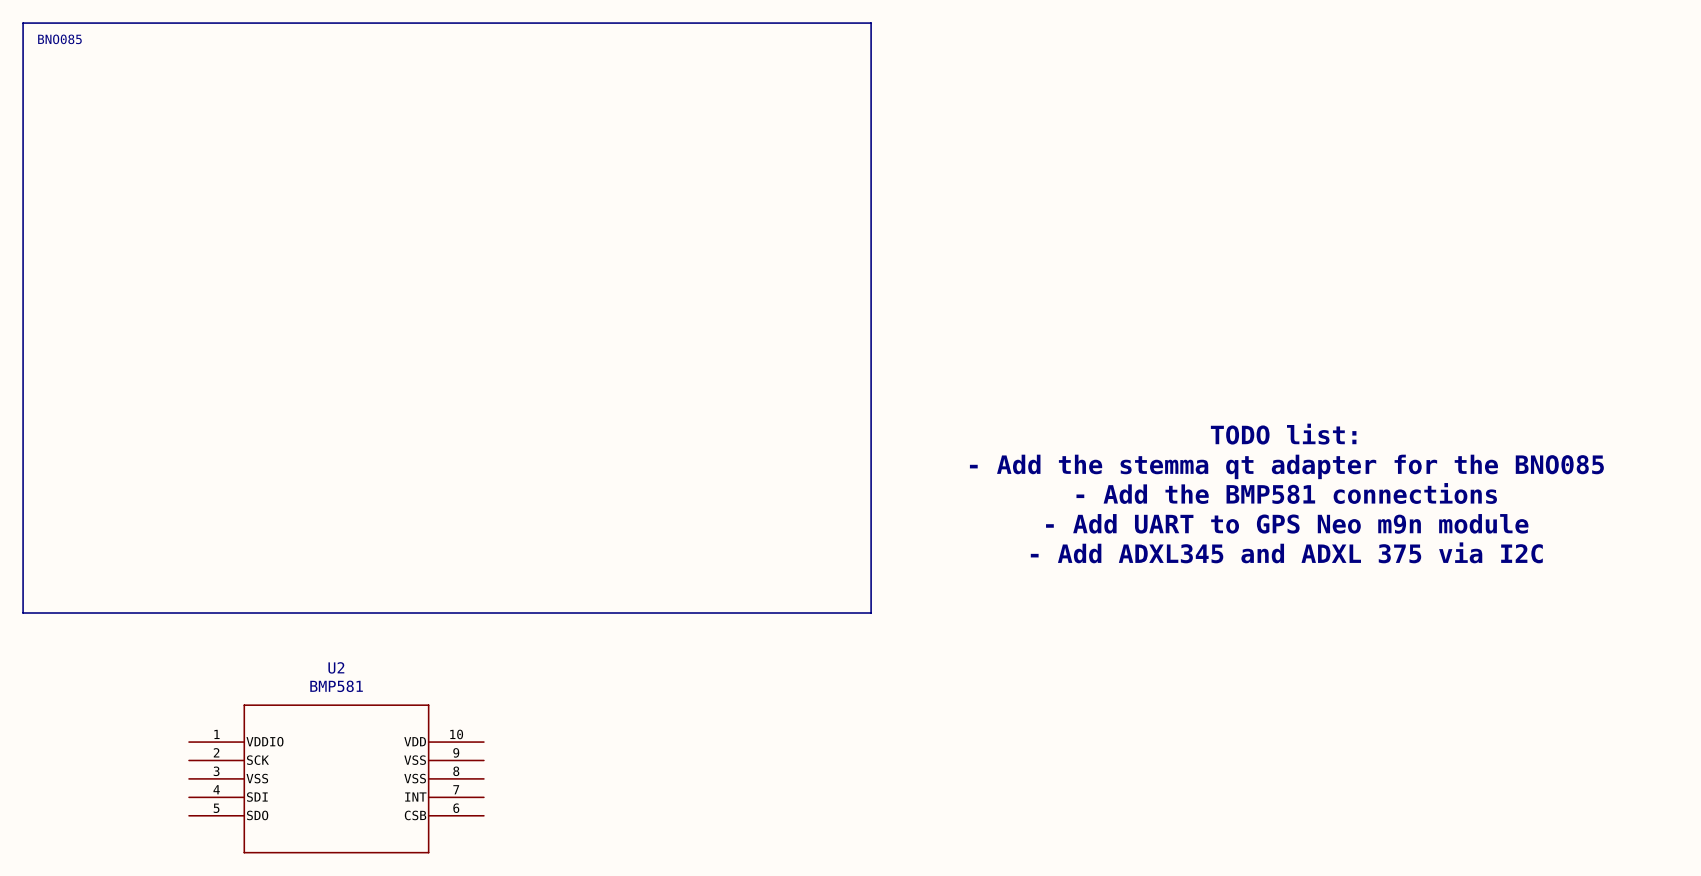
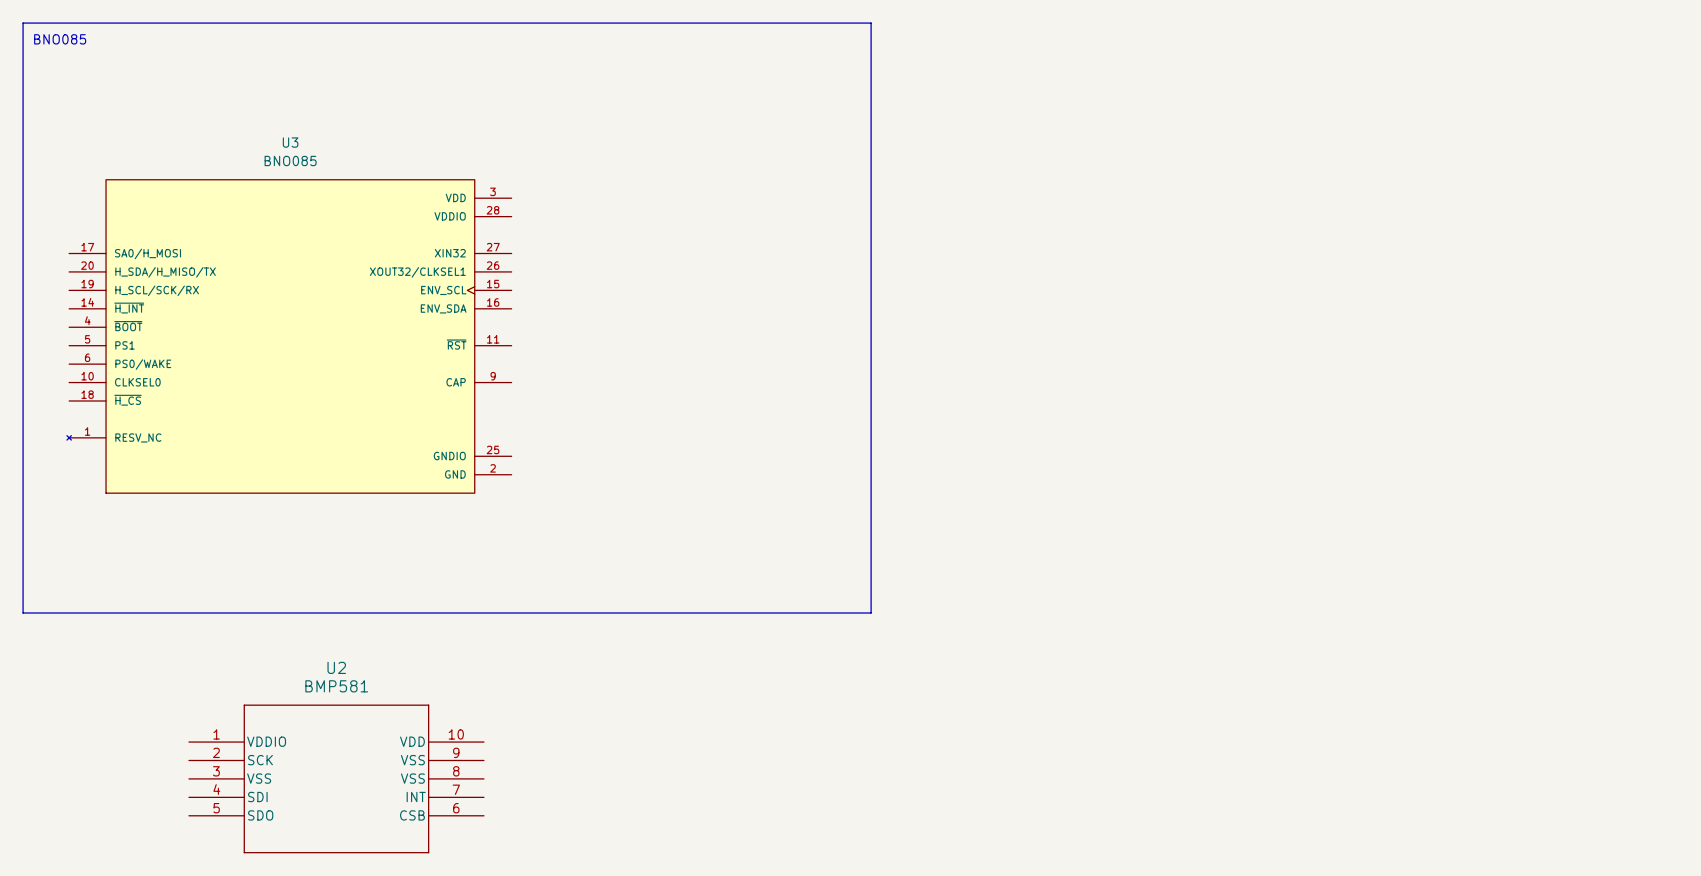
U3: none -> BNO085 (289, 336)
text: TODO list: (1283, 434) -> none
text: - Add the stemma qt adapter for the BNO085 (1286, 466) -> none
text: - Add the BMP581 connections (1286, 493) -> none
text: - Add UART to GPS Neo m9n module (1287, 523) -> none
text: - Add ADXL345 and ADXL 375 via I2C (1286, 552) -> none

